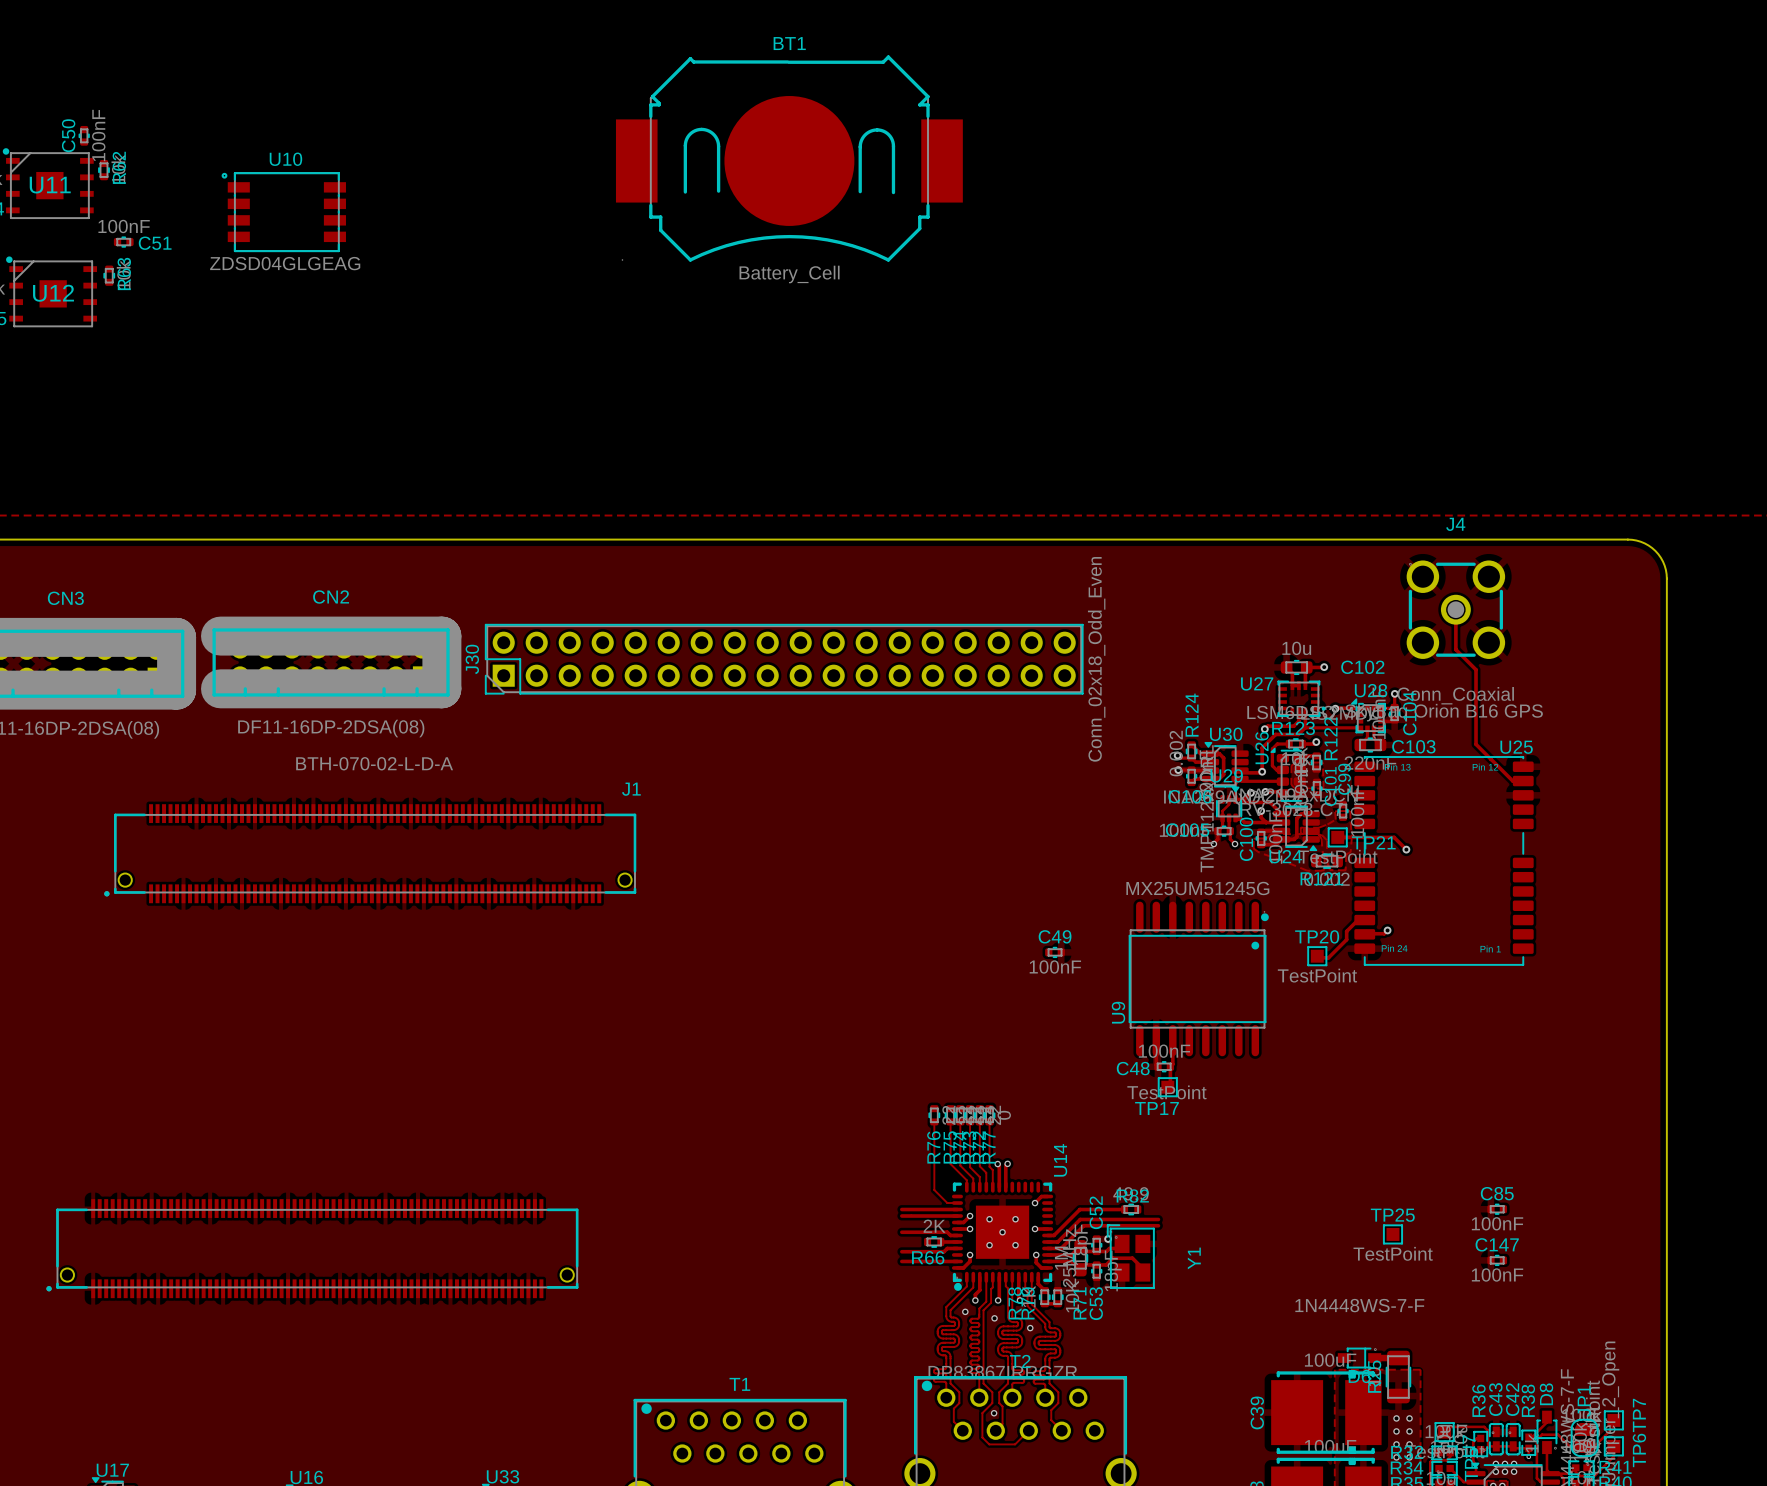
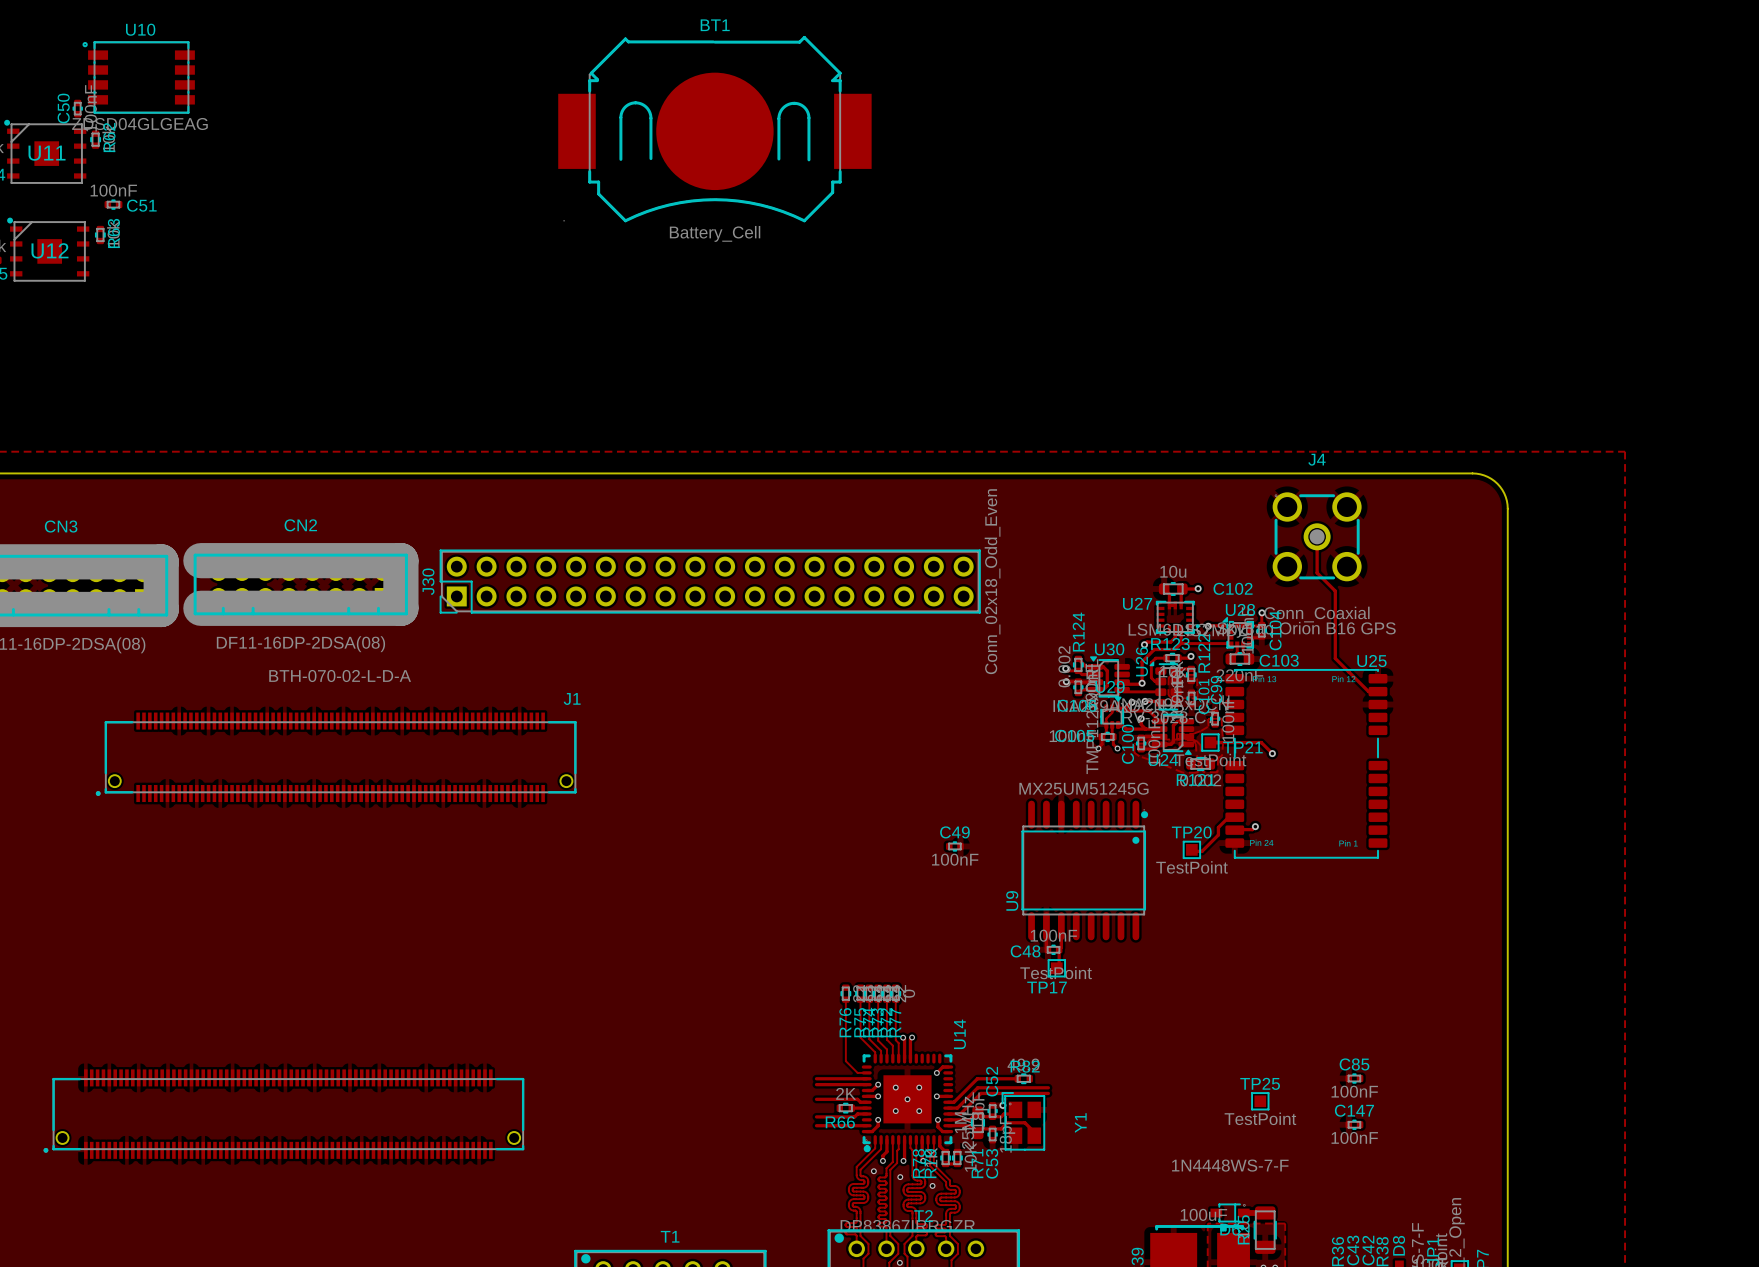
U10 position: (283, 212) -> (138, 77)

